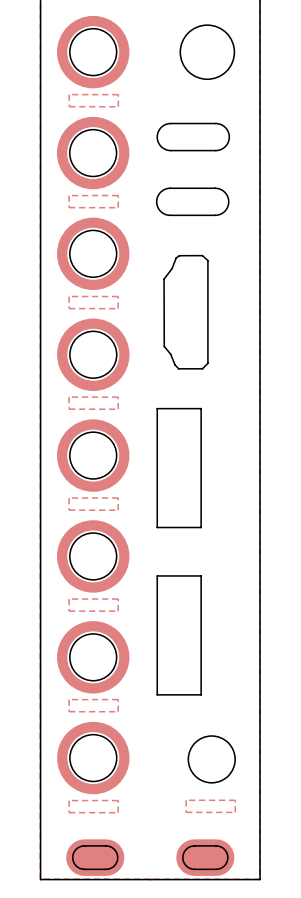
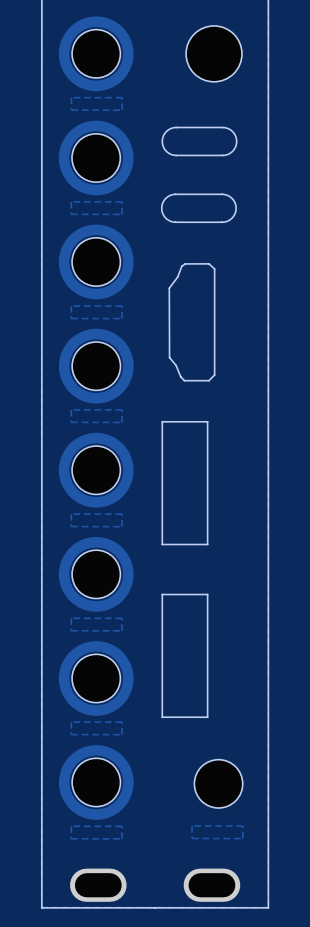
board edge: (84, 845) (111, 847) (117, 854) (116, 863) (107, 869) (78, 867) (73, 862) (73, 854) (77, 848) (84, 845) -> none
board edge: (194, 845) (221, 847) (227, 853) (226, 863) (217, 869) (189, 867) (184, 863) (183, 854) (187, 847) (194, 845) -> none
track: (84, 857) (106, 857) -> none
part: none -> (98, 885)
track: (194, 857) (216, 857) -> none
part: none -> (211, 885)

